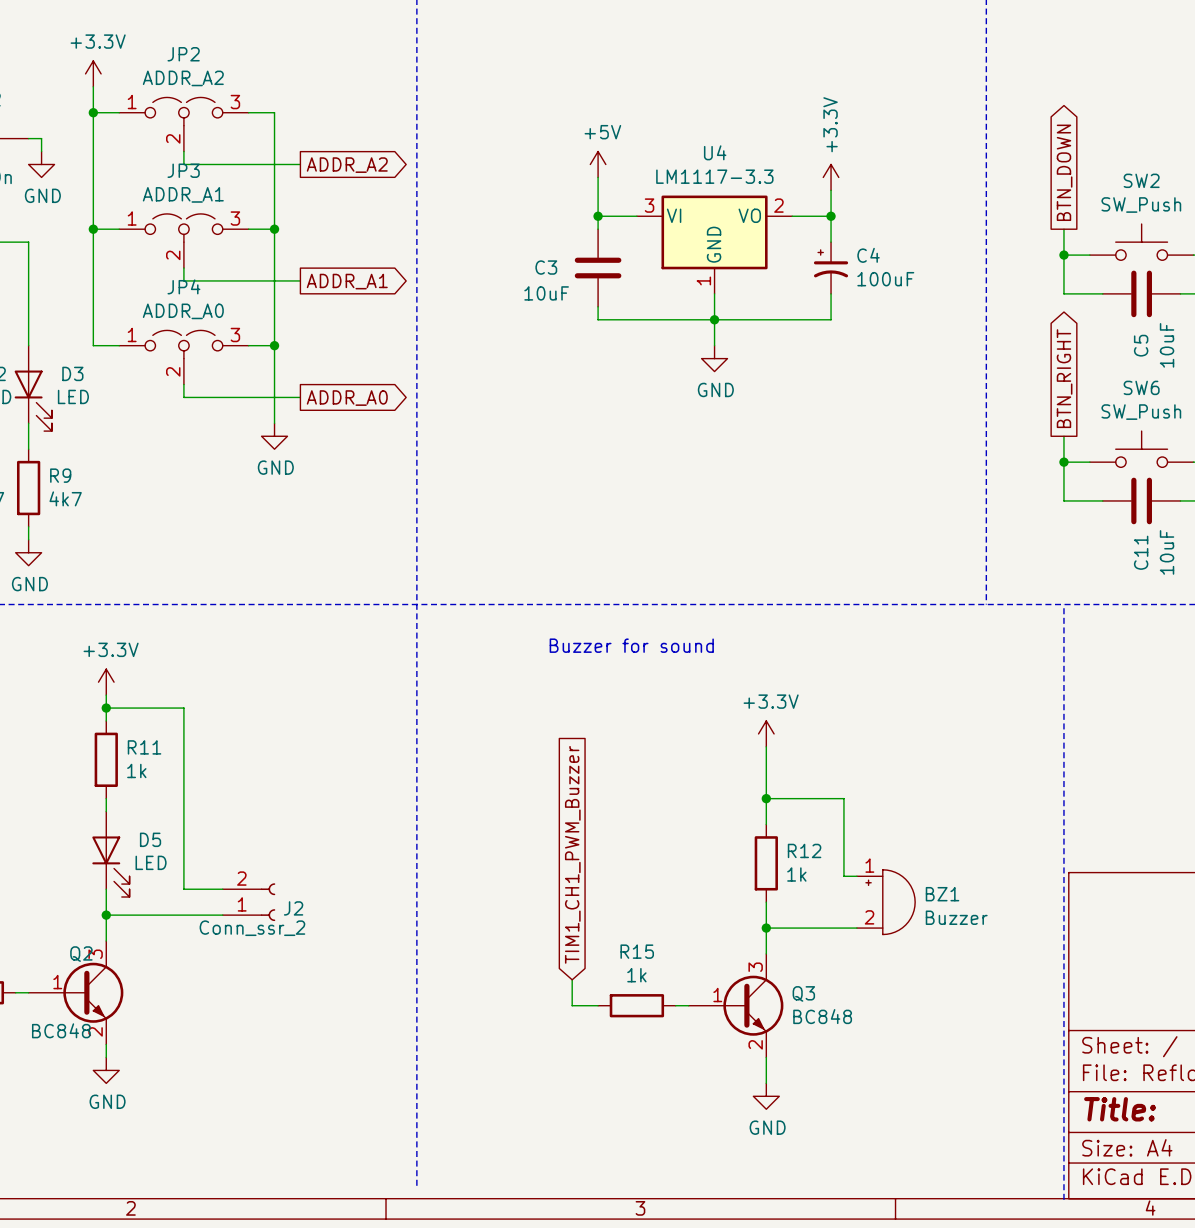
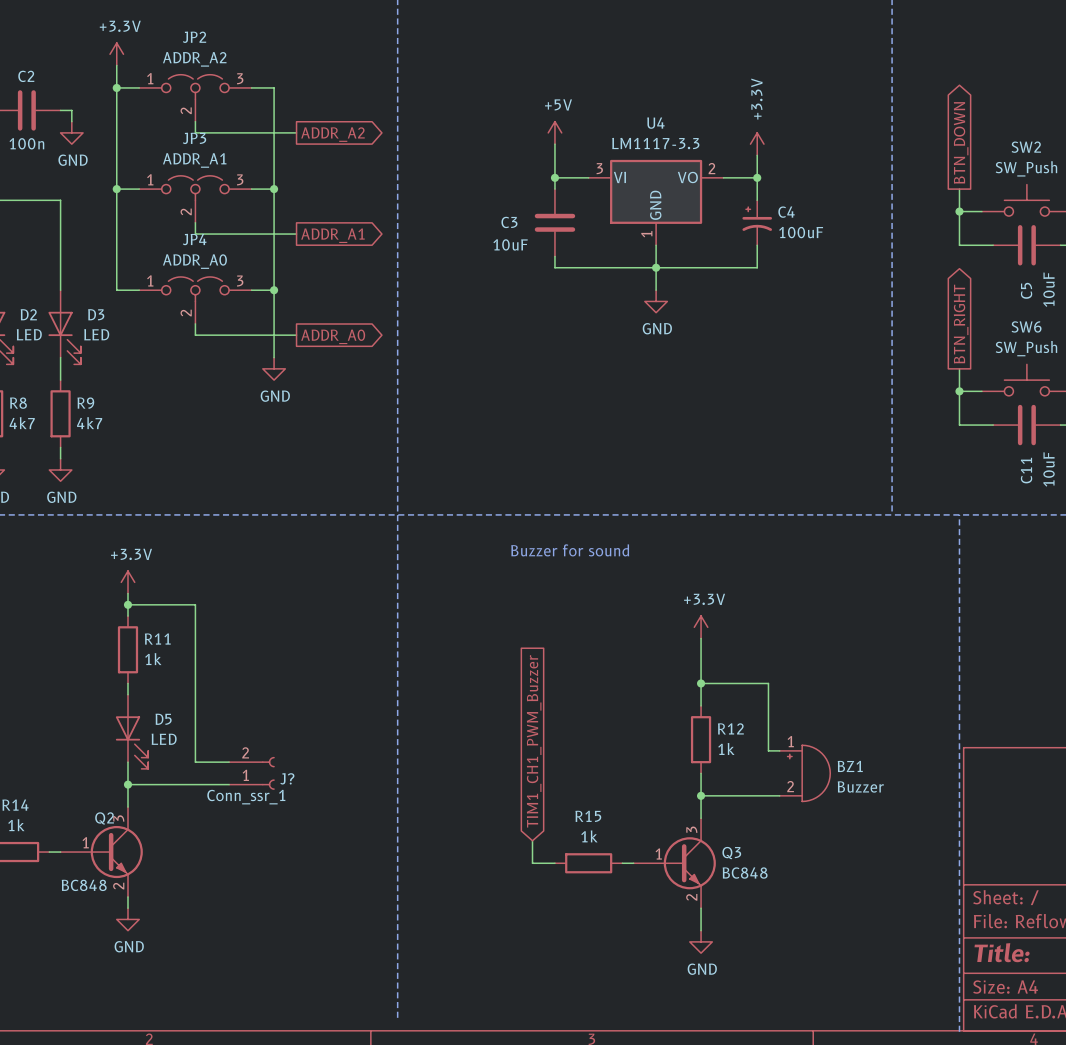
J2 name: J2 (293, 908) -> J? (287, 778)
J2 value: Conn_ssr_2 (252, 928) -> Conn_ssr_1 (246, 797)

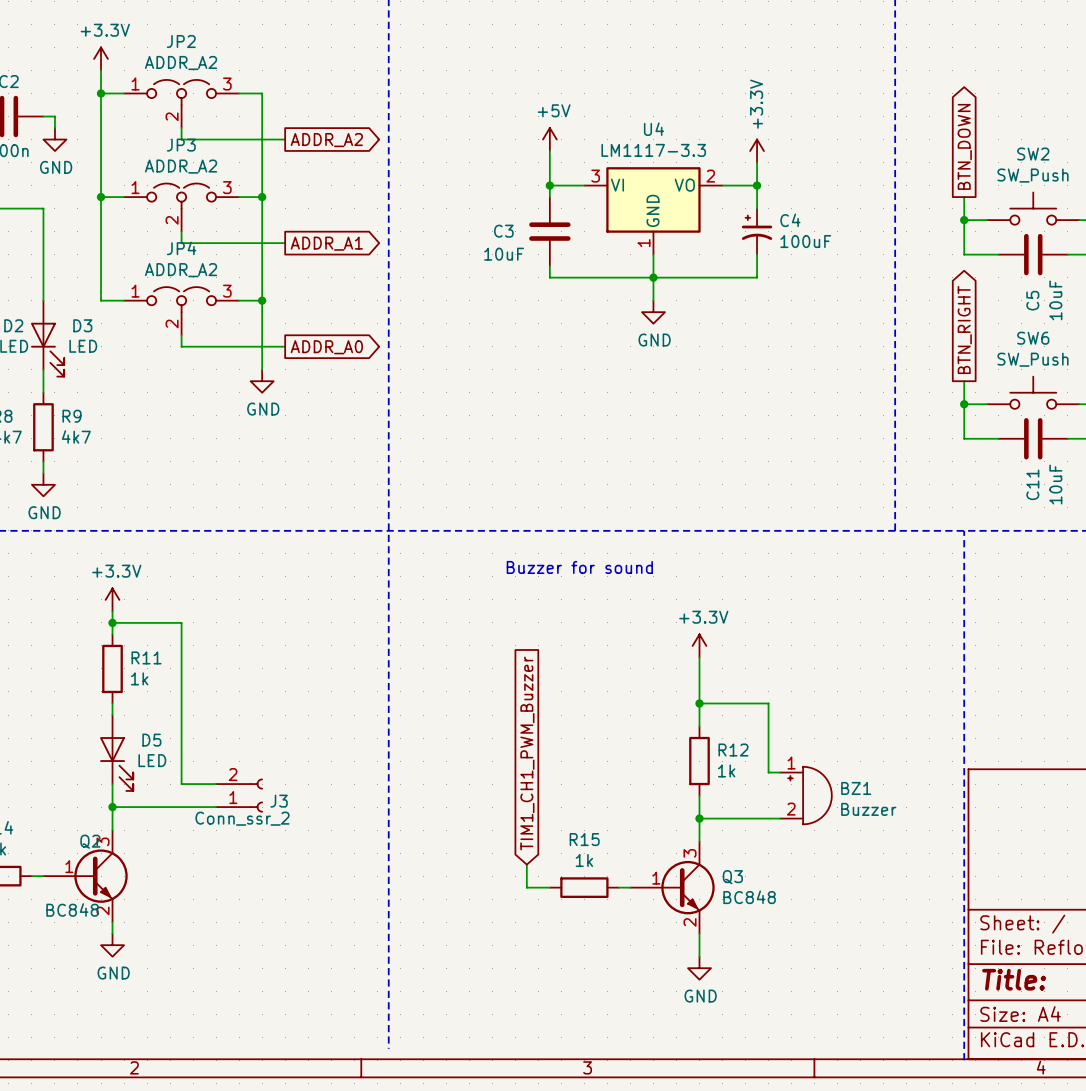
JP3 value: ADDR_A1 (194, 160) -> ADDR_A2 (181, 166)
JP4 value: ADDR_A0 (194, 261) -> ADDR_A2 (181, 270)
J? name: J? (287, 778) -> J3 (279, 801)
J? value: Conn_ssr_1 (246, 797) -> Conn_ssr_2 (242, 818)

